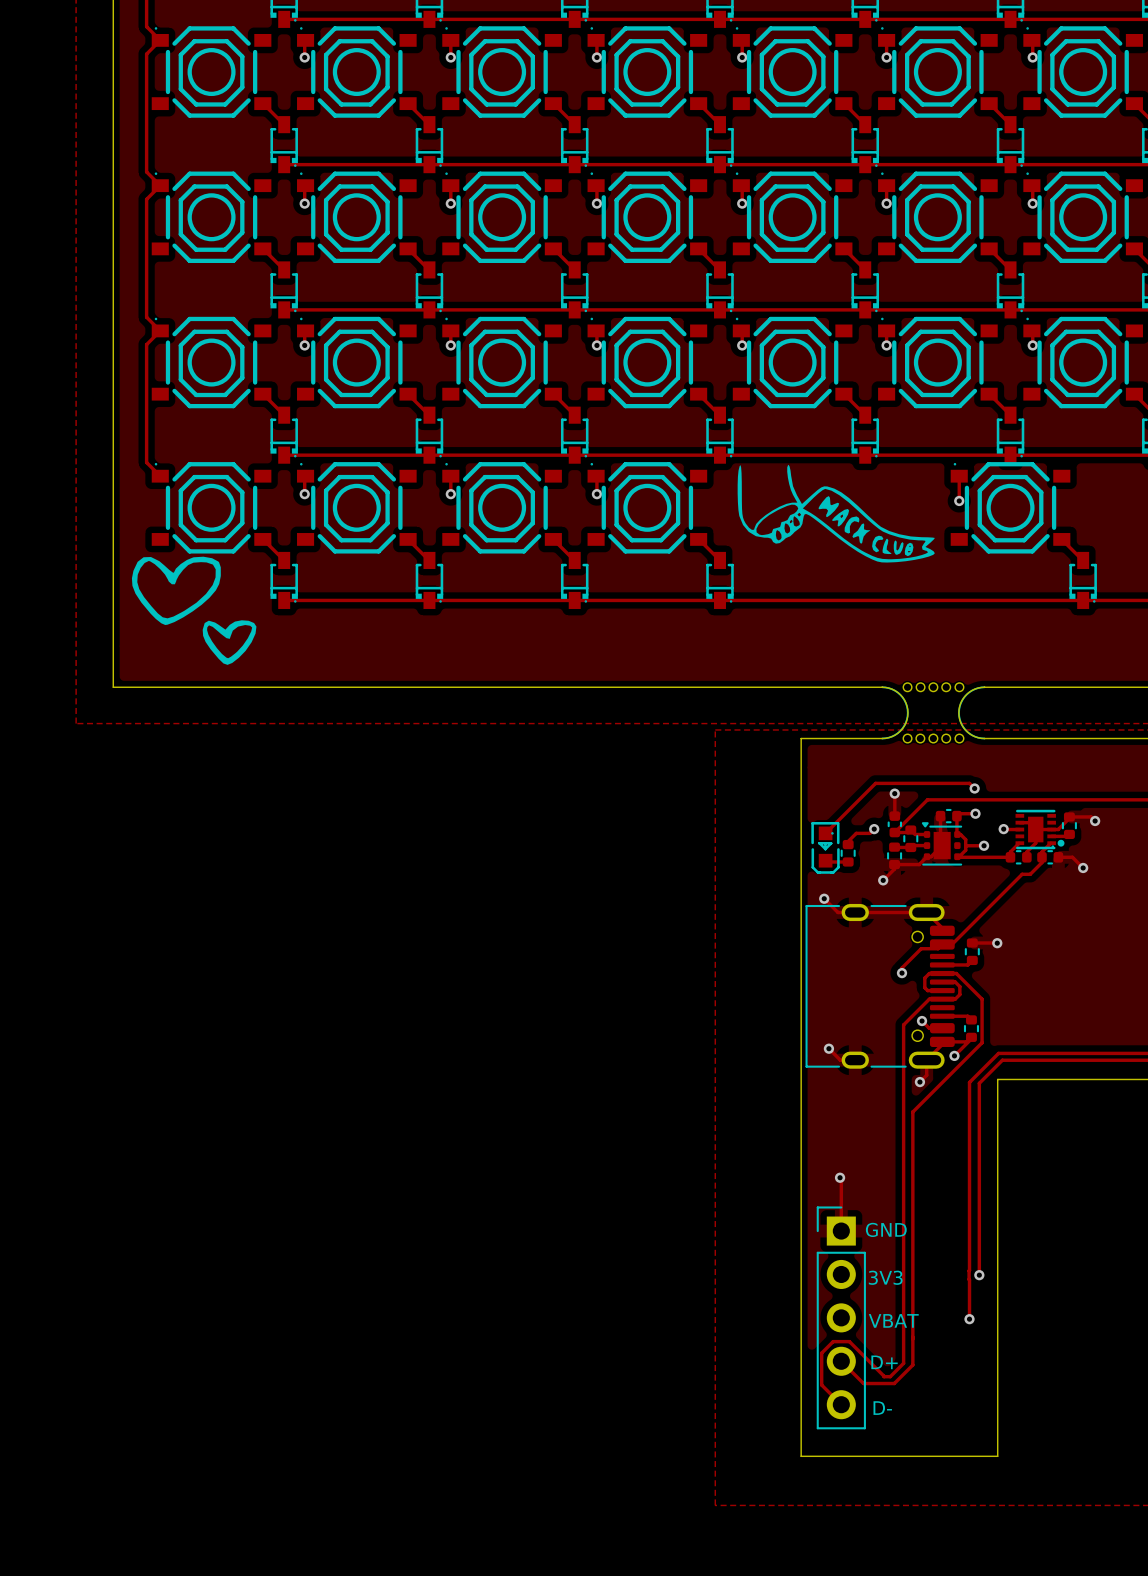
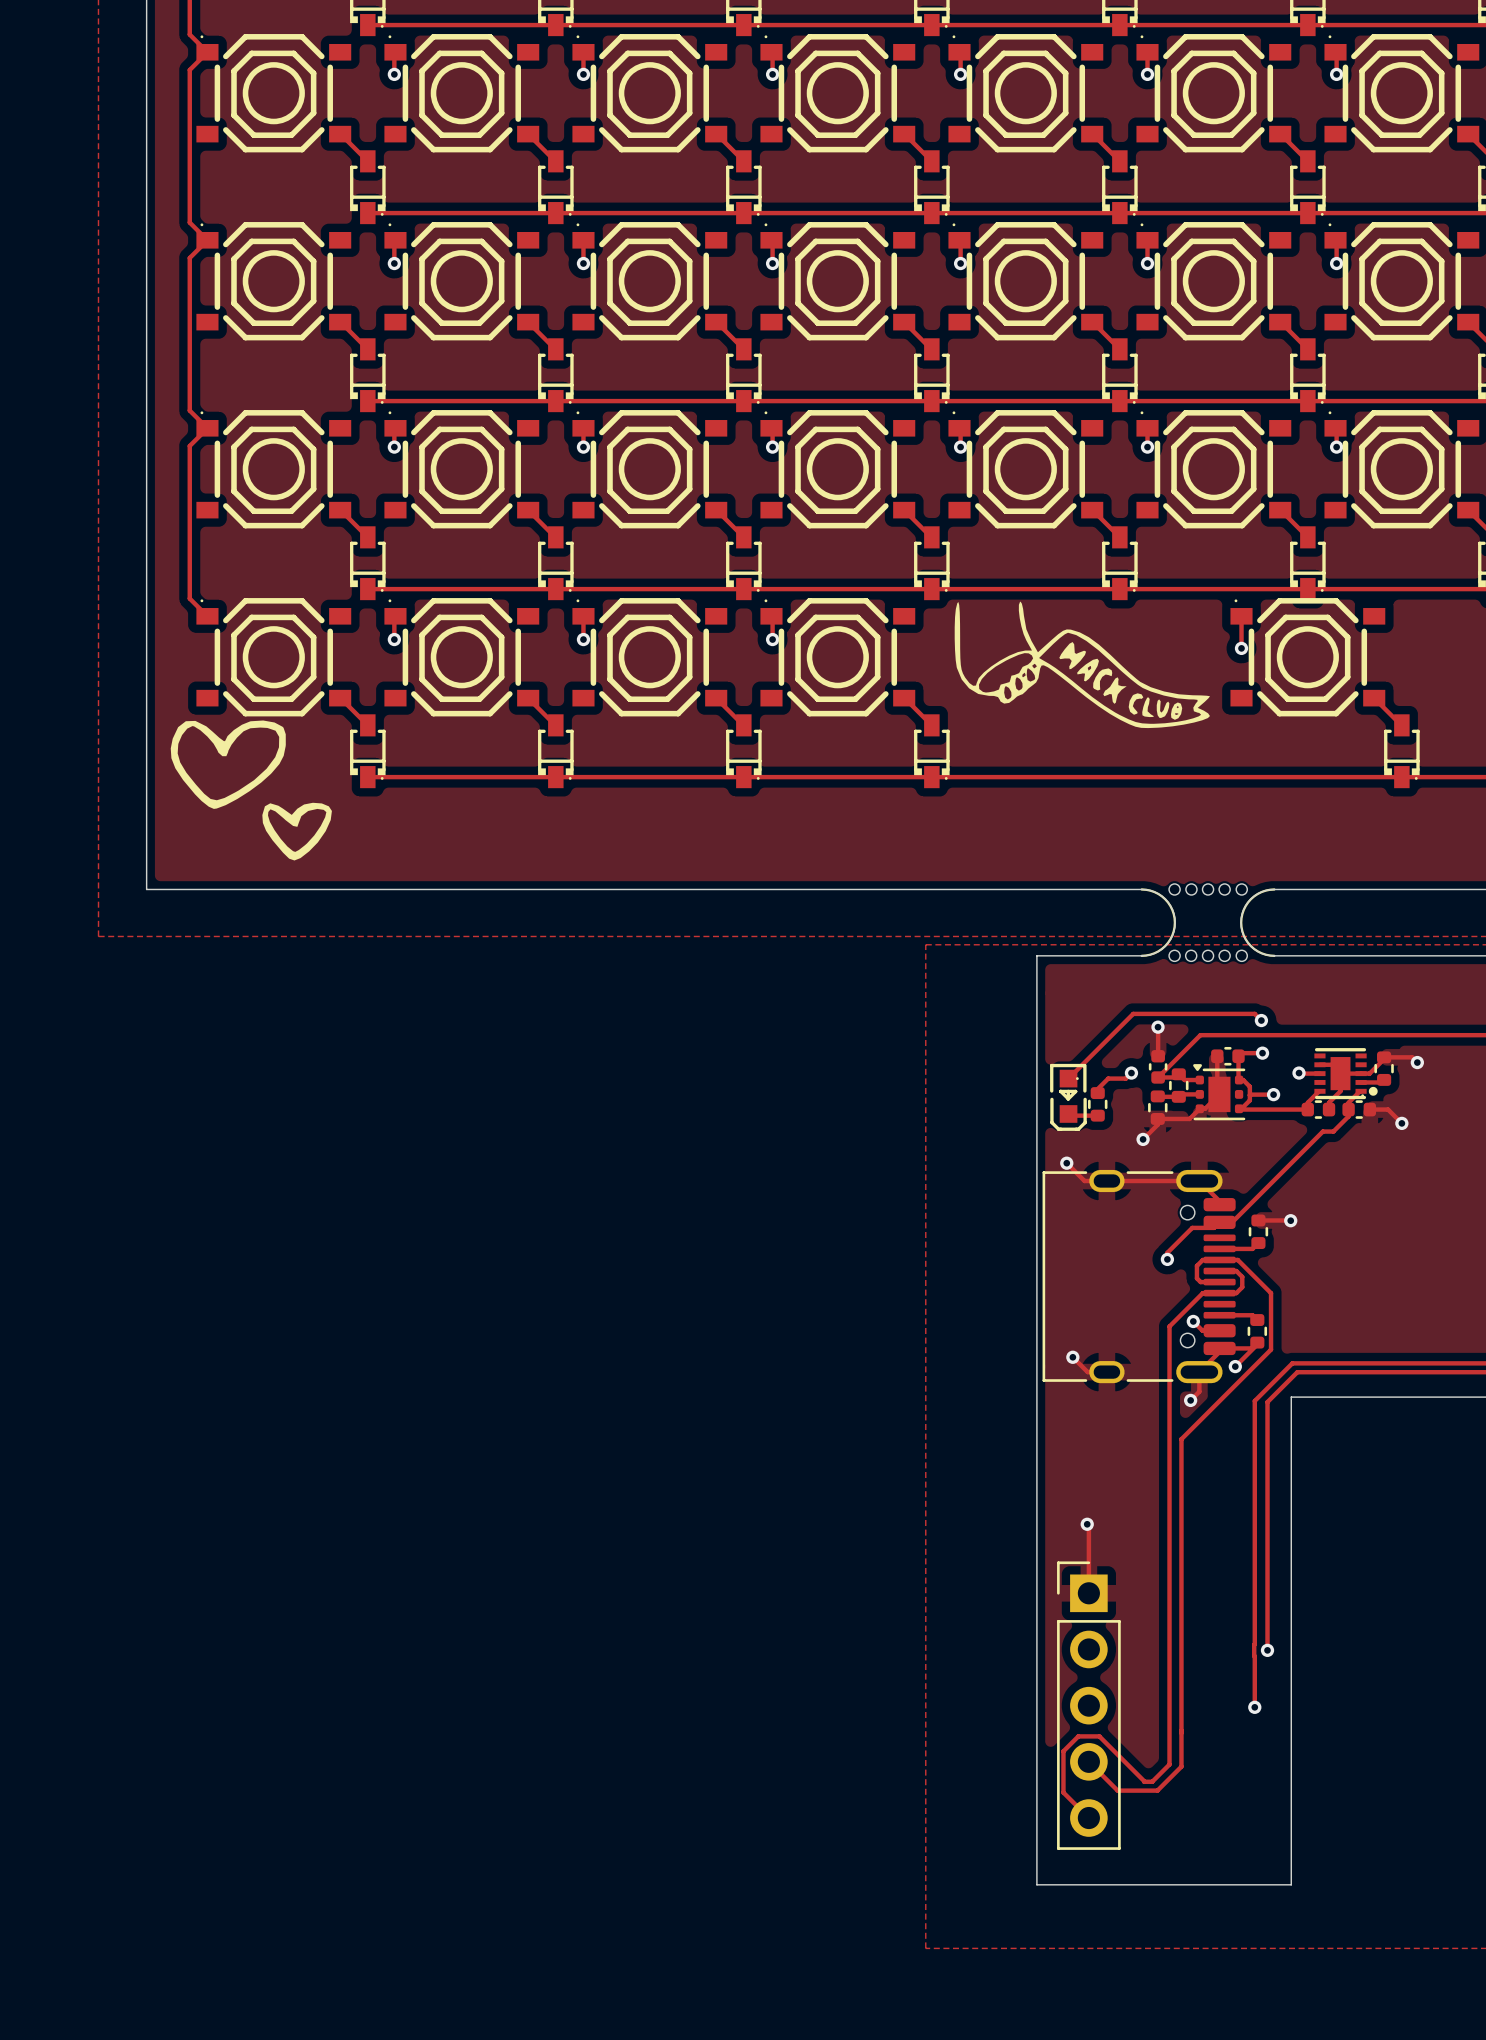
text: GND (886, 1229) -> none
text: 3V3 (885, 1277) -> none
text: VBAT (893, 1320) -> none
text: D+ (884, 1362) -> none
text: D- (882, 1408) -> none

